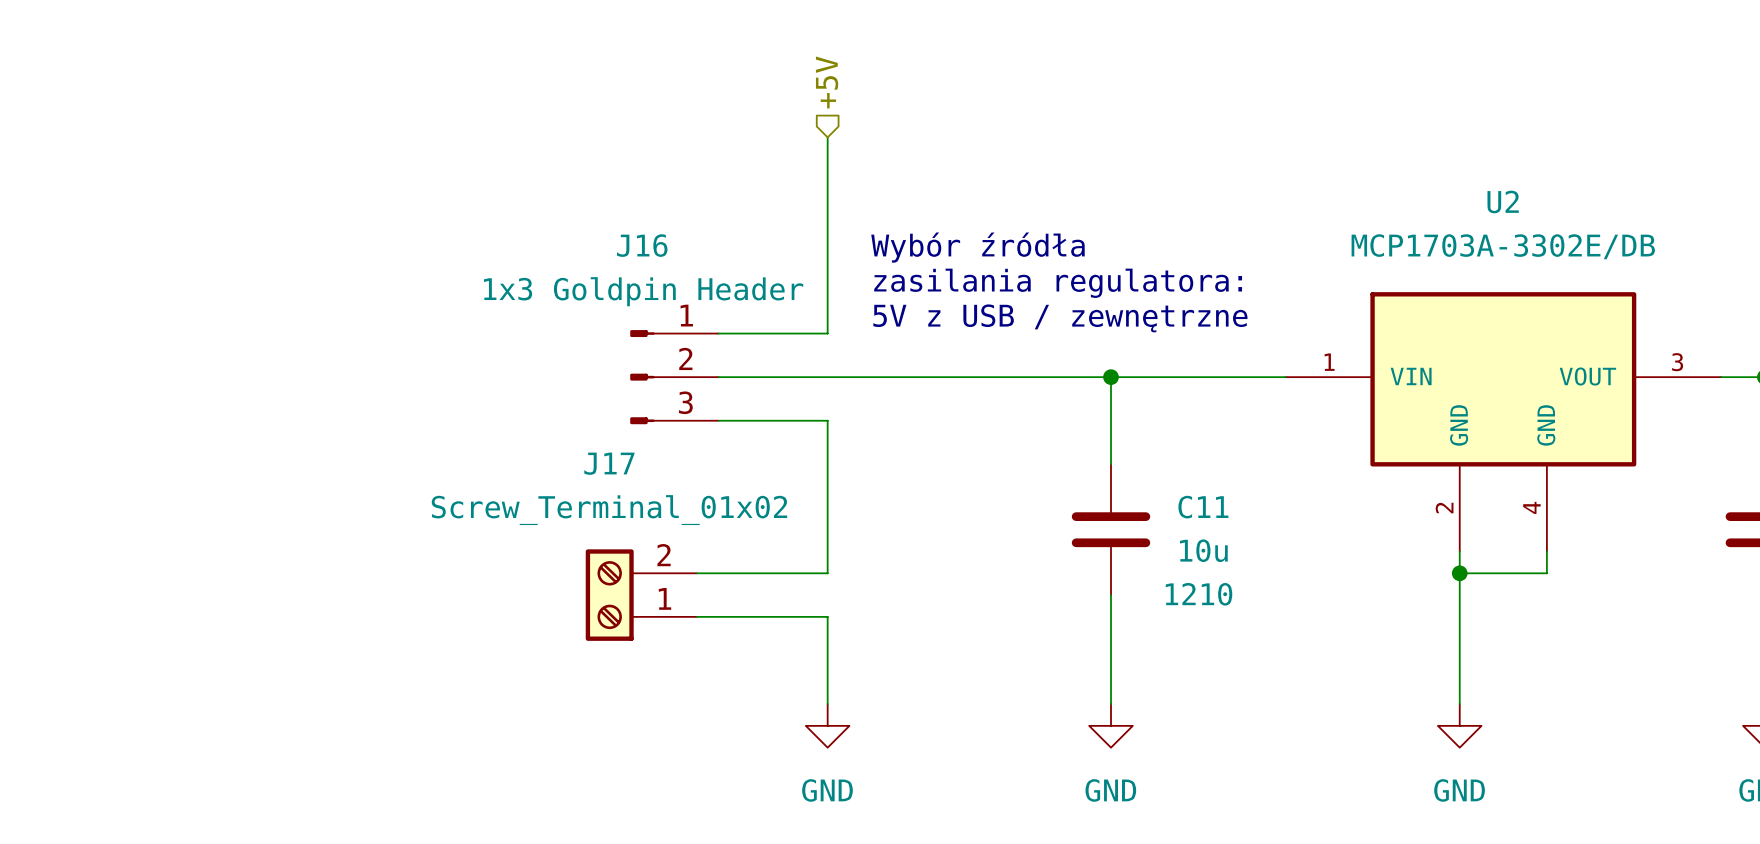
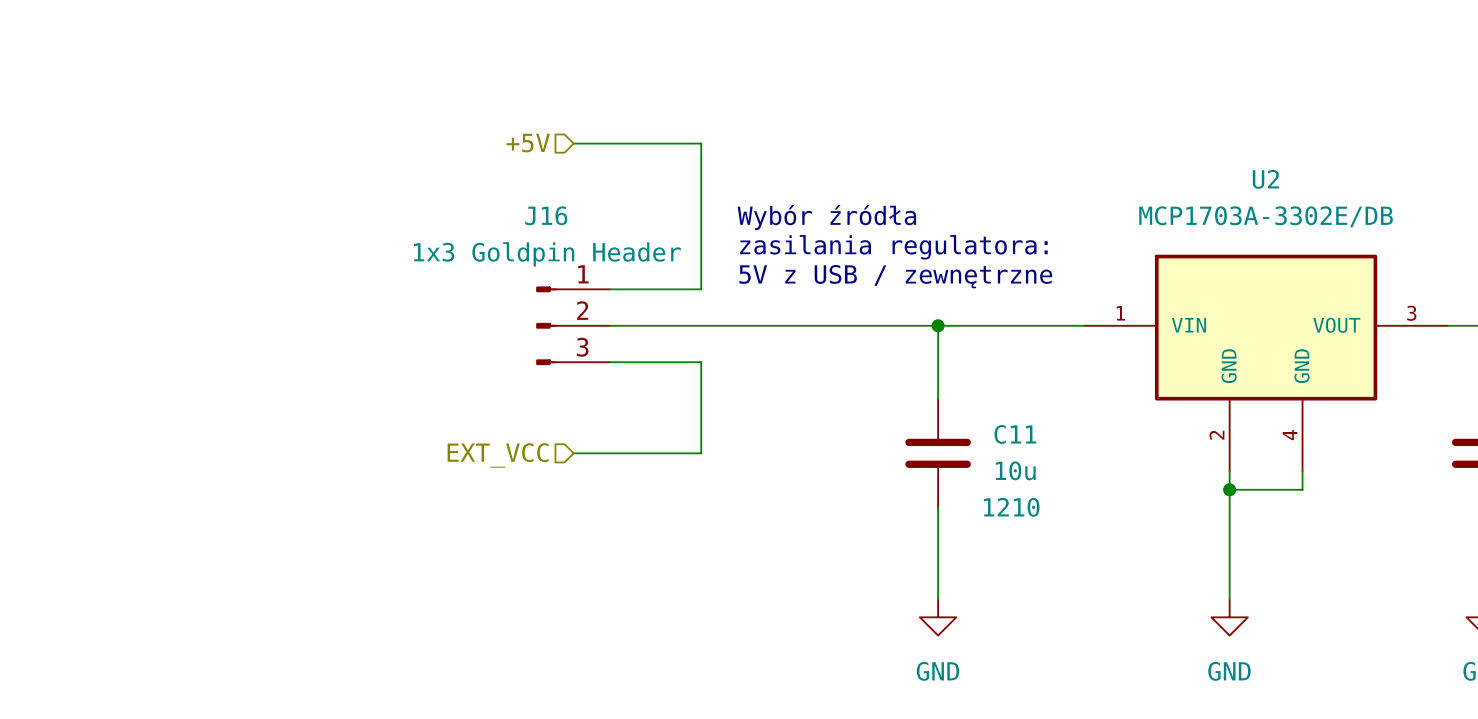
hierarchical label rotation: 0° (827, 82) -> 90° counterclockwise (528, 143)
hierarchical label position: +5V (827, 82) -> +5V (528, 143)
wire: (827, 137) (827, 159) -> (573, 143) (701, 143)
wire: (827, 529) (827, 573) (696, 573) -> (701, 453) (573, 453)
hierarchical label: none -> EXT_VCC (498, 455)
J17: Screw_Terminal_01x02 (641, 595) -> none
wire: (696, 616) (827, 616) (827, 704) -> none
power symbol: GND (827, 725) -> none

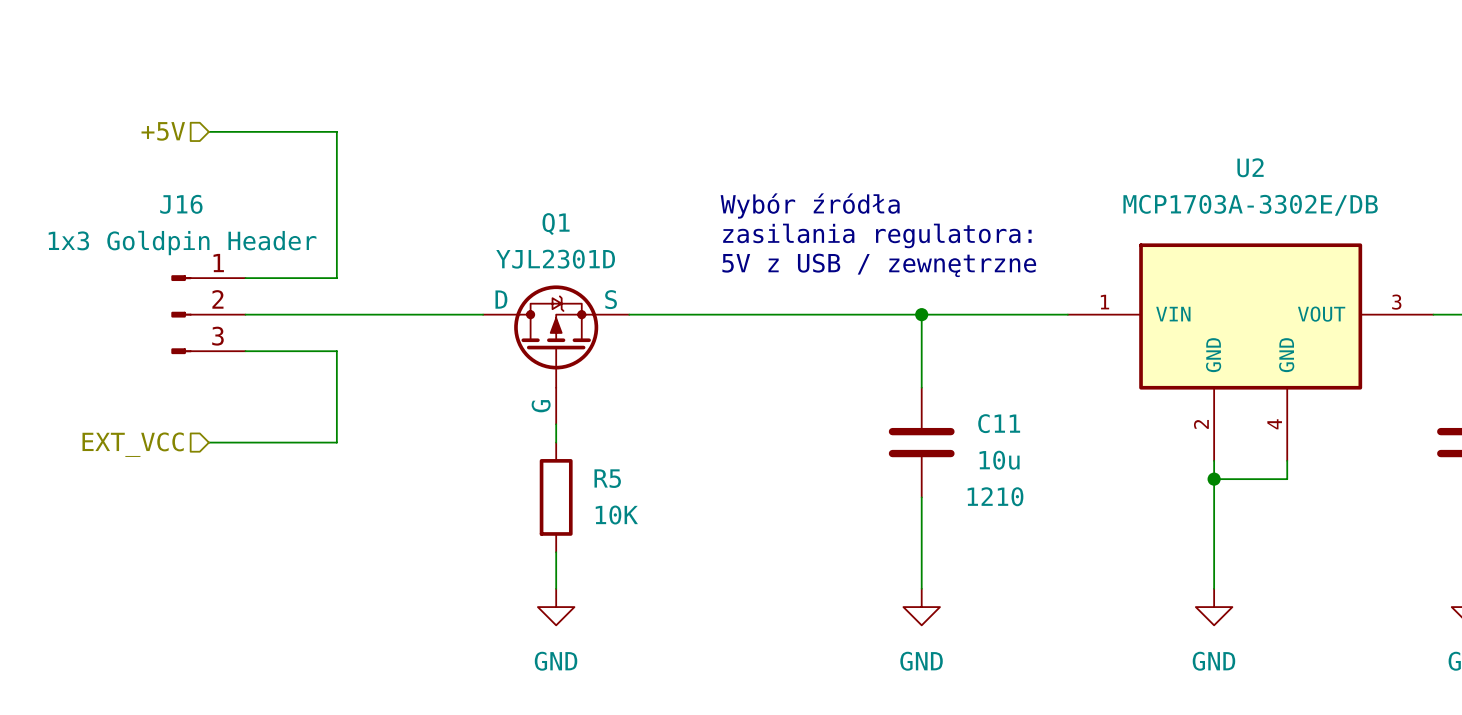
hierarchical label position: +5V (528, 143) -> +5V (163, 131)
wire: (573, 143) (701, 143) (701, 289) (610, 289) -> (208, 131) (336, 131) (336, 278) (245, 278)
wire: none -> (245, 314) (483, 314)
J16 position: (573, 325) -> (208, 314)
wire: none -> (245, 351) (336, 351) (336, 442) (208, 442)
wire: (610, 362) (701, 362) (701, 453) (573, 453) -> (556, 424) (556, 442)
Q1: none -> YJL2301D (556, 354)
hierarchical label position: EXT_VCC (498, 455) -> EXT_VCC (133, 444)
R5: none -> 10K (556, 497)
wire: none -> (556, 552) (556, 588)
power symbol: none -> GND (556, 607)

